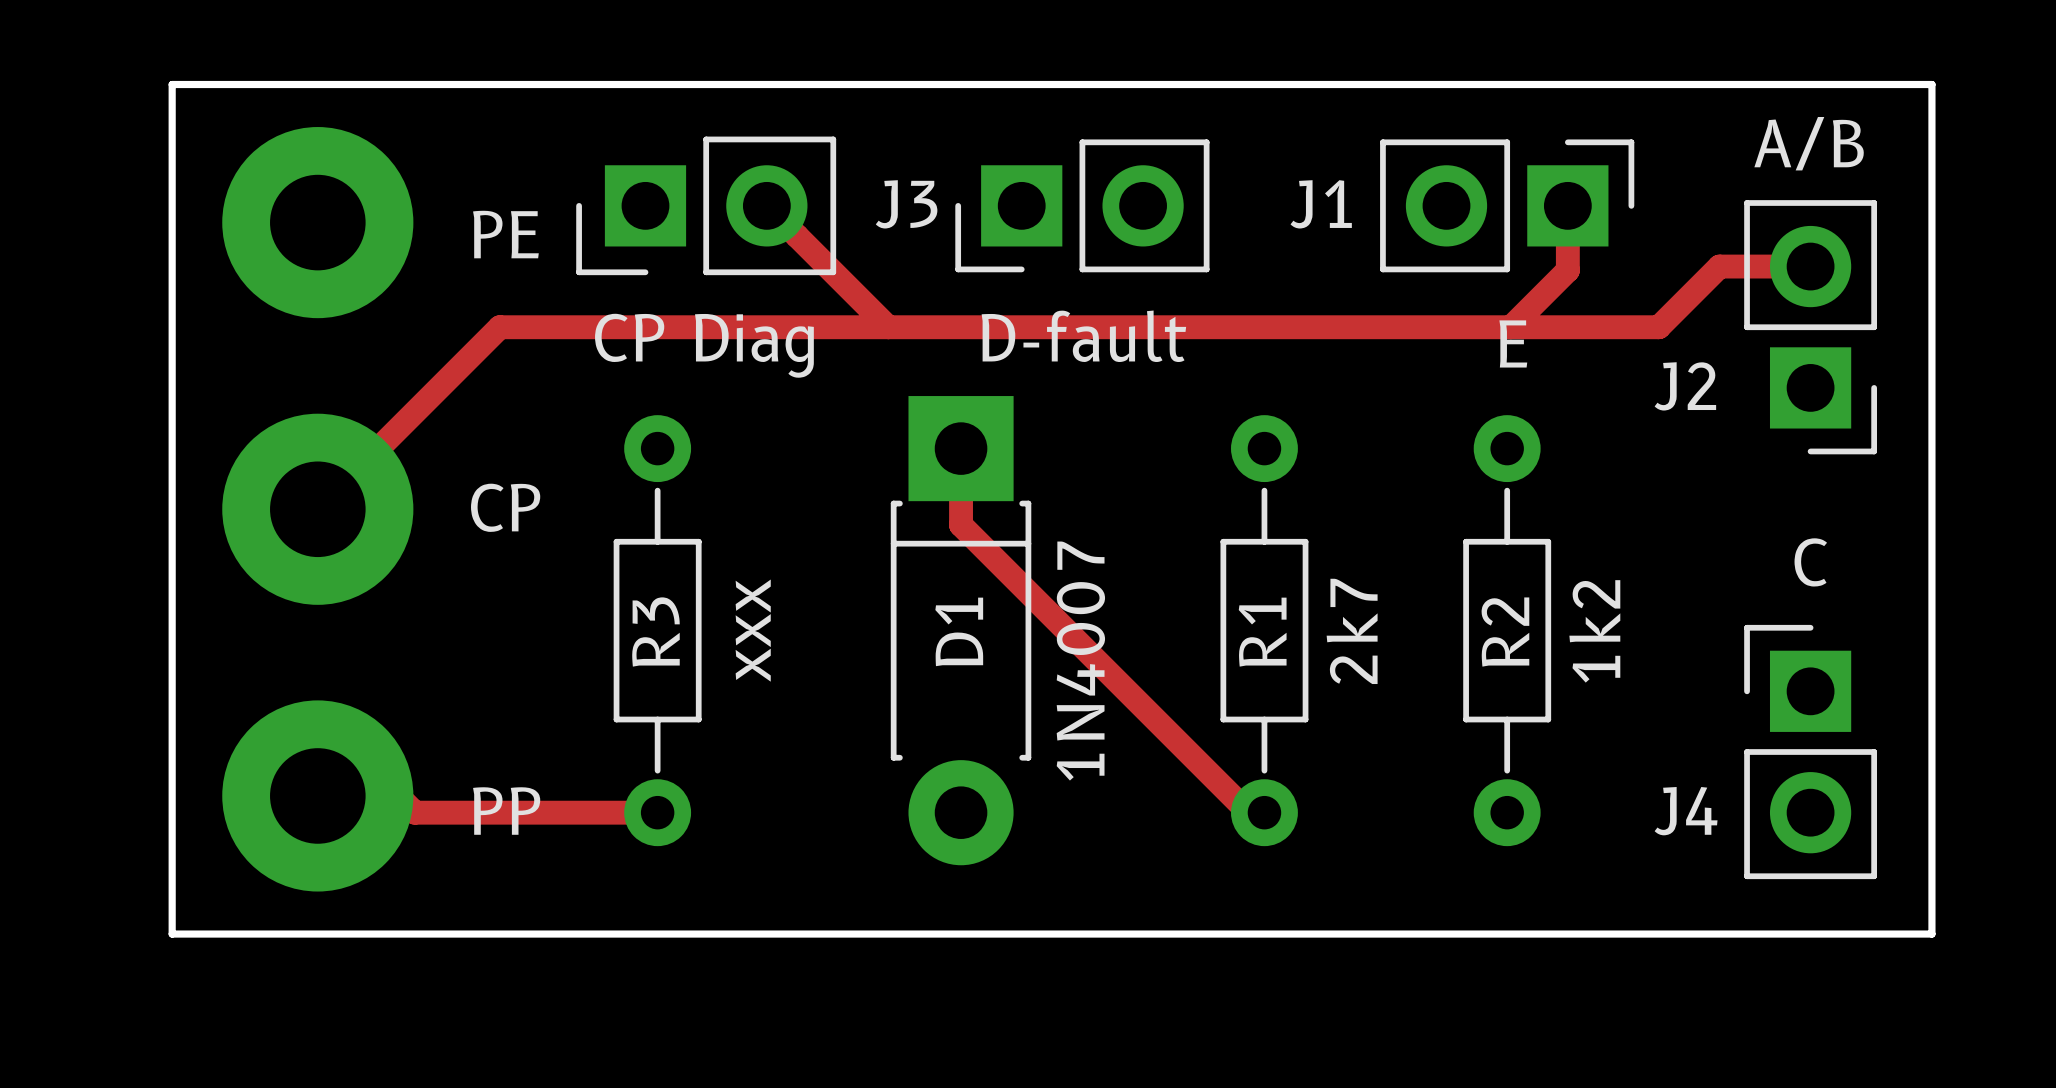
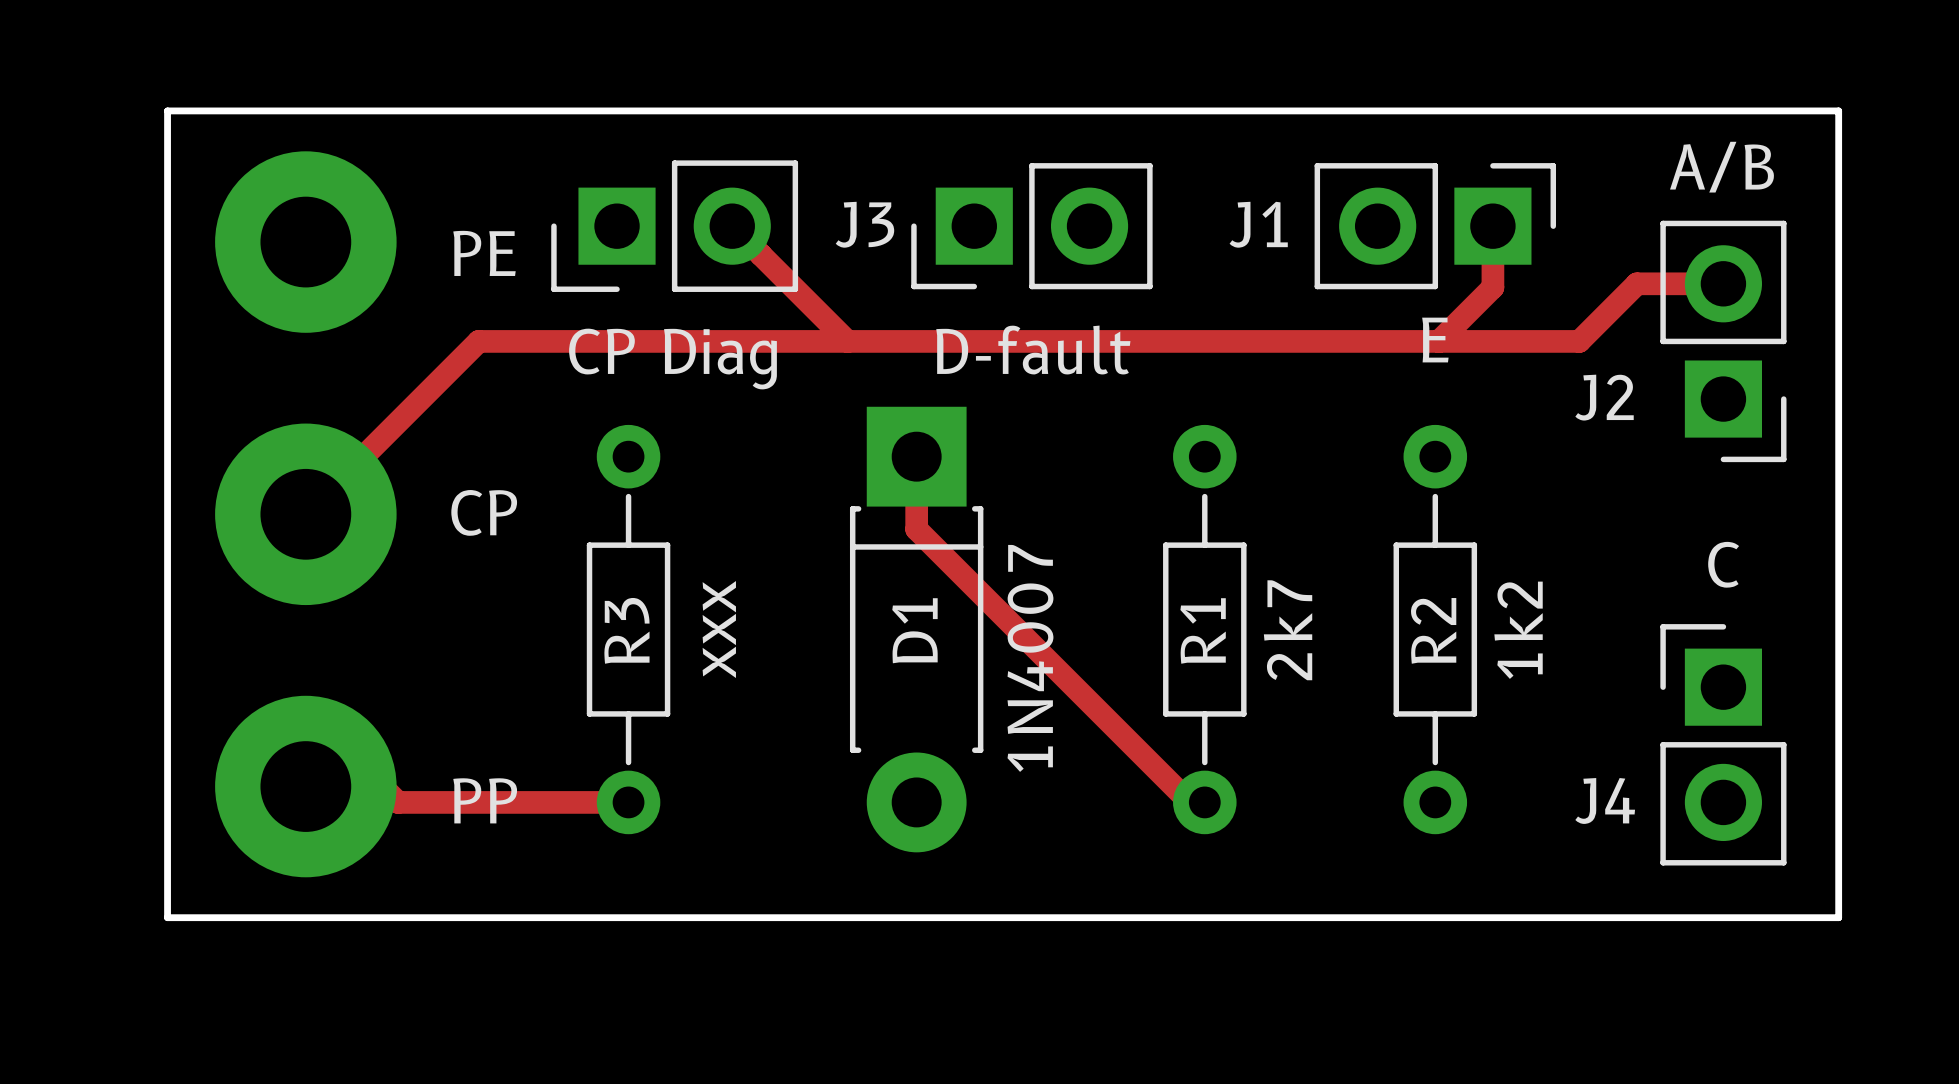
J1 value position: E (1513, 343) -> E (1435, 340)

